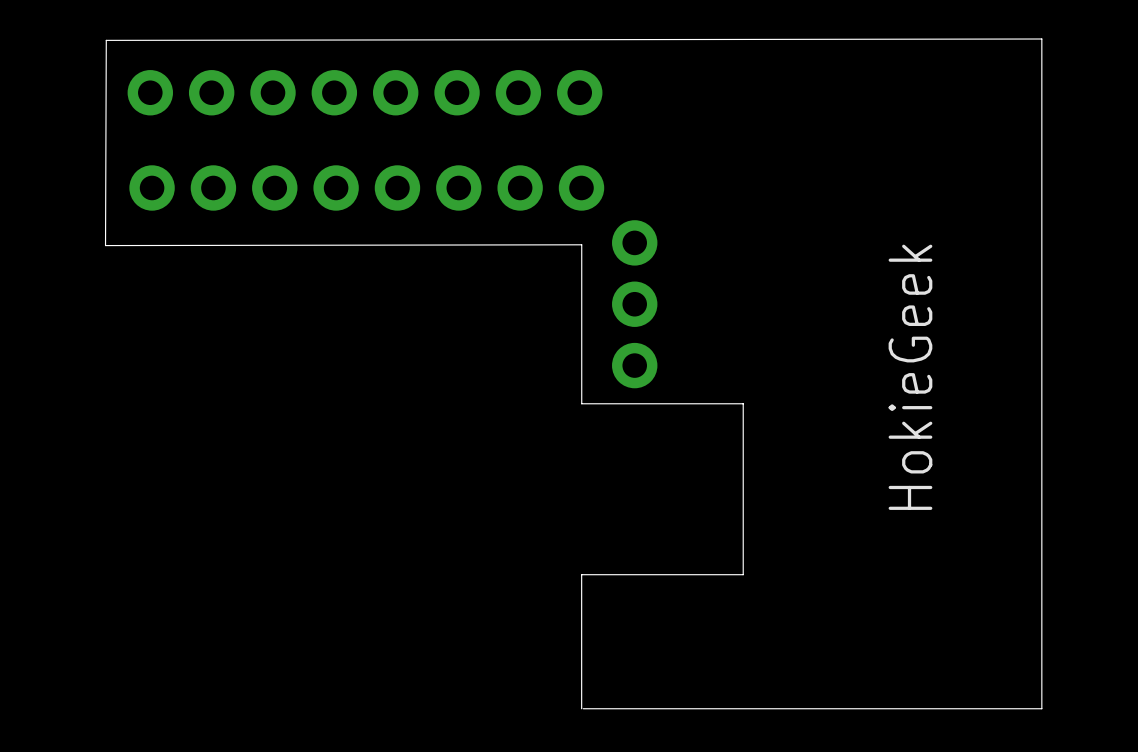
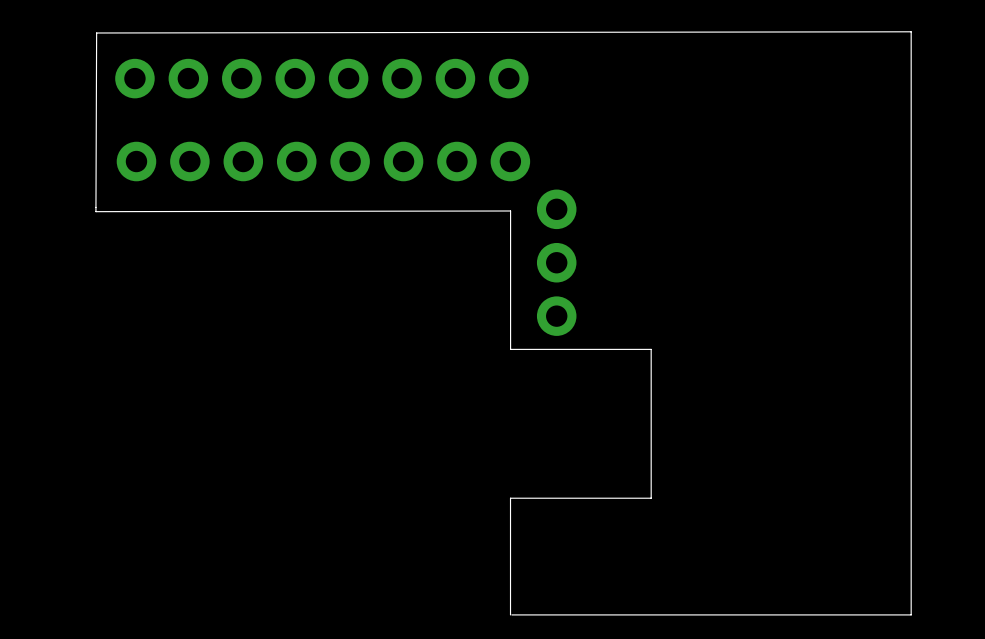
text: HokieGeek (910, 377) -> none

